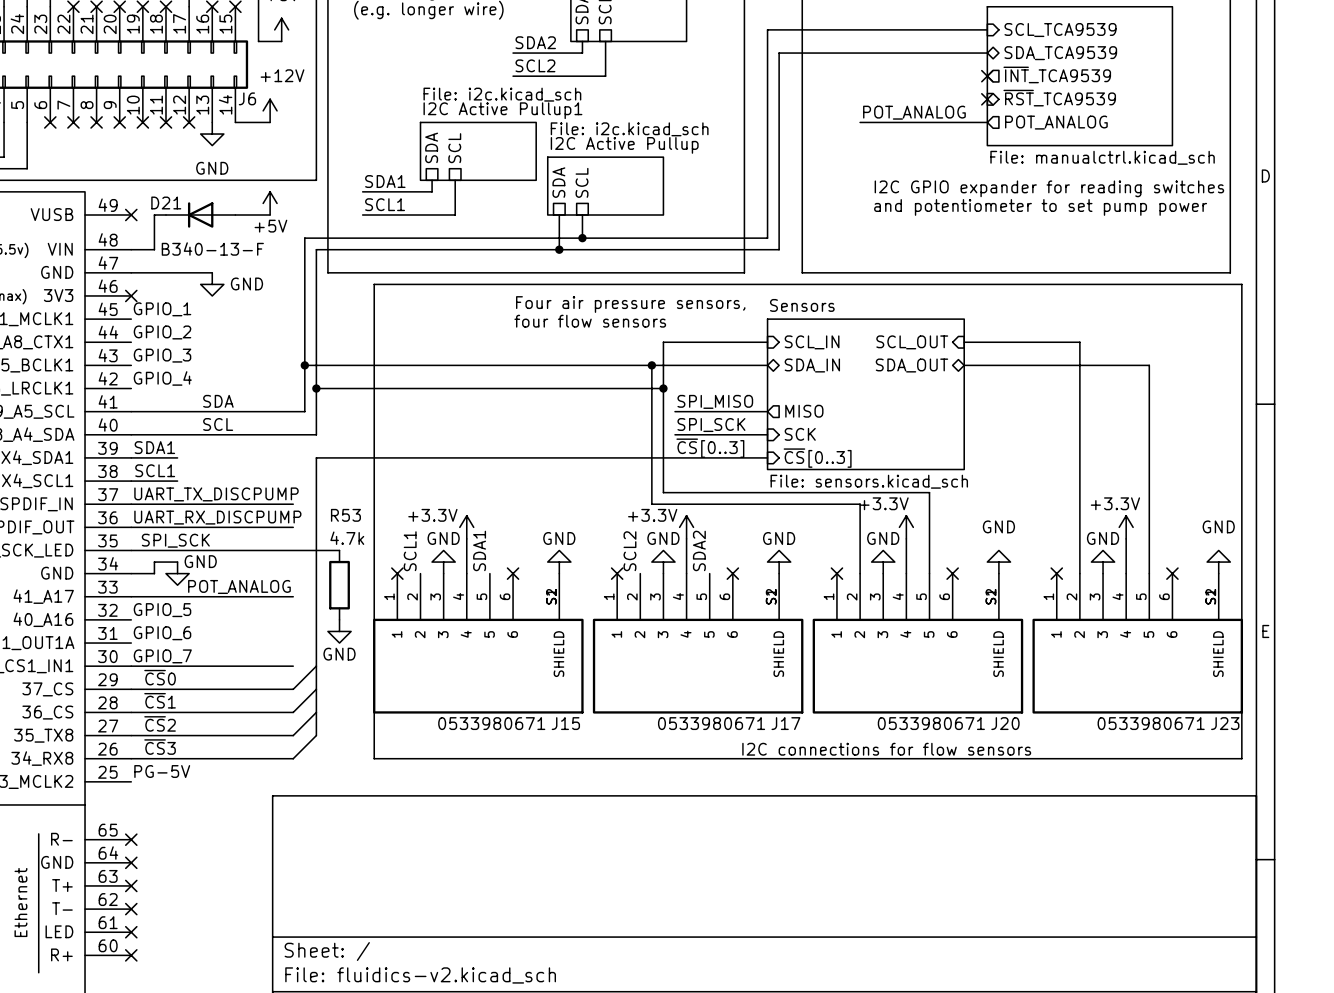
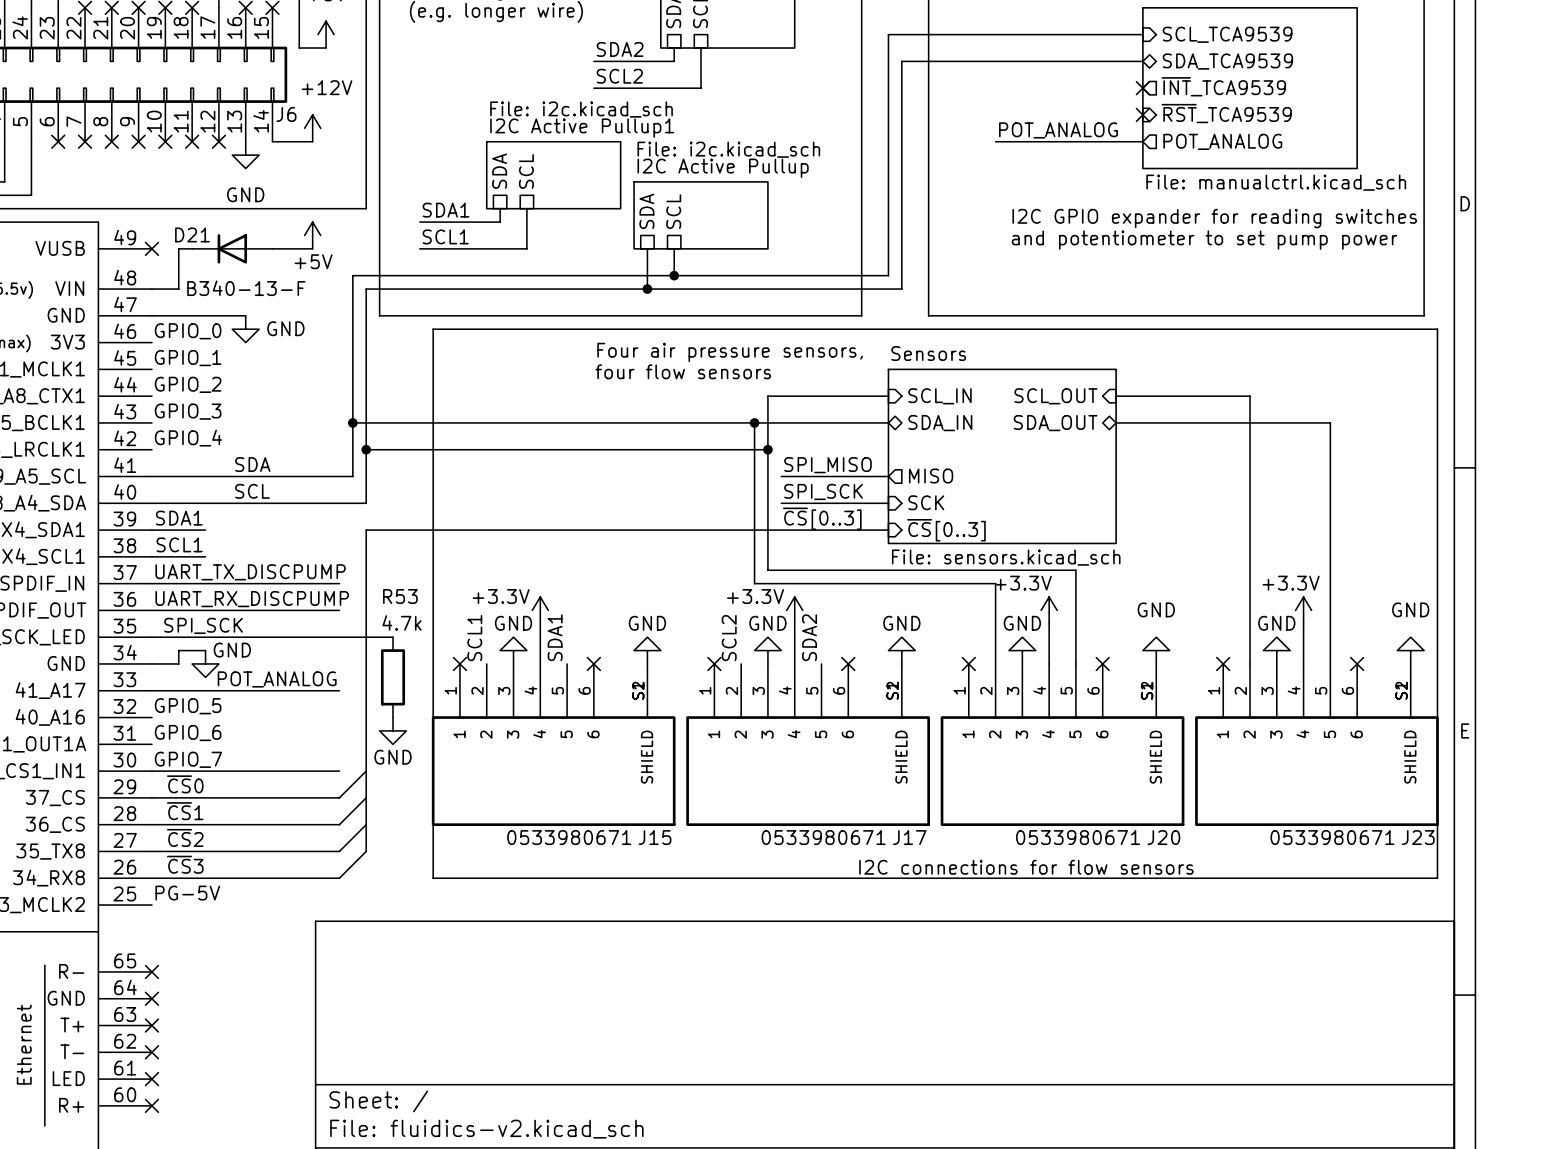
label: none -> GPIO_0 (188, 331)
no-connect mark: (131, 295) -> none

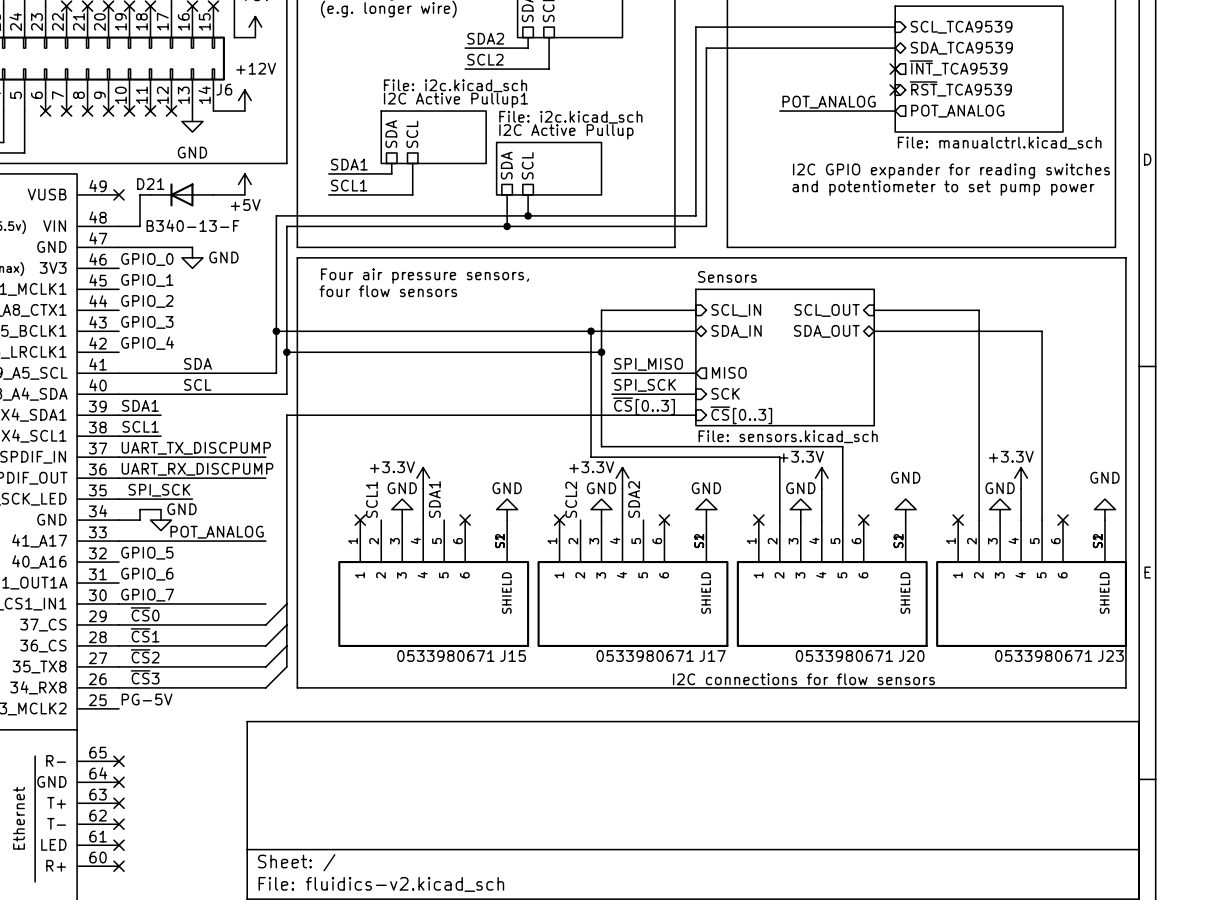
line: (433, 329) (433, 878) -> (339, 257) (297, 257) (297, 687) (339, 687)
text position: Four air pressure sensors, (730, 352) -> Four air pressure sensors, (425, 276)
text position: four flow sensors (683, 371) -> four flow sensors (388, 291)
wire: (245, 637) (393, 637) -> none
R53: 4.7k (393, 677) -> none
power symbol: GND (393, 730) -> none

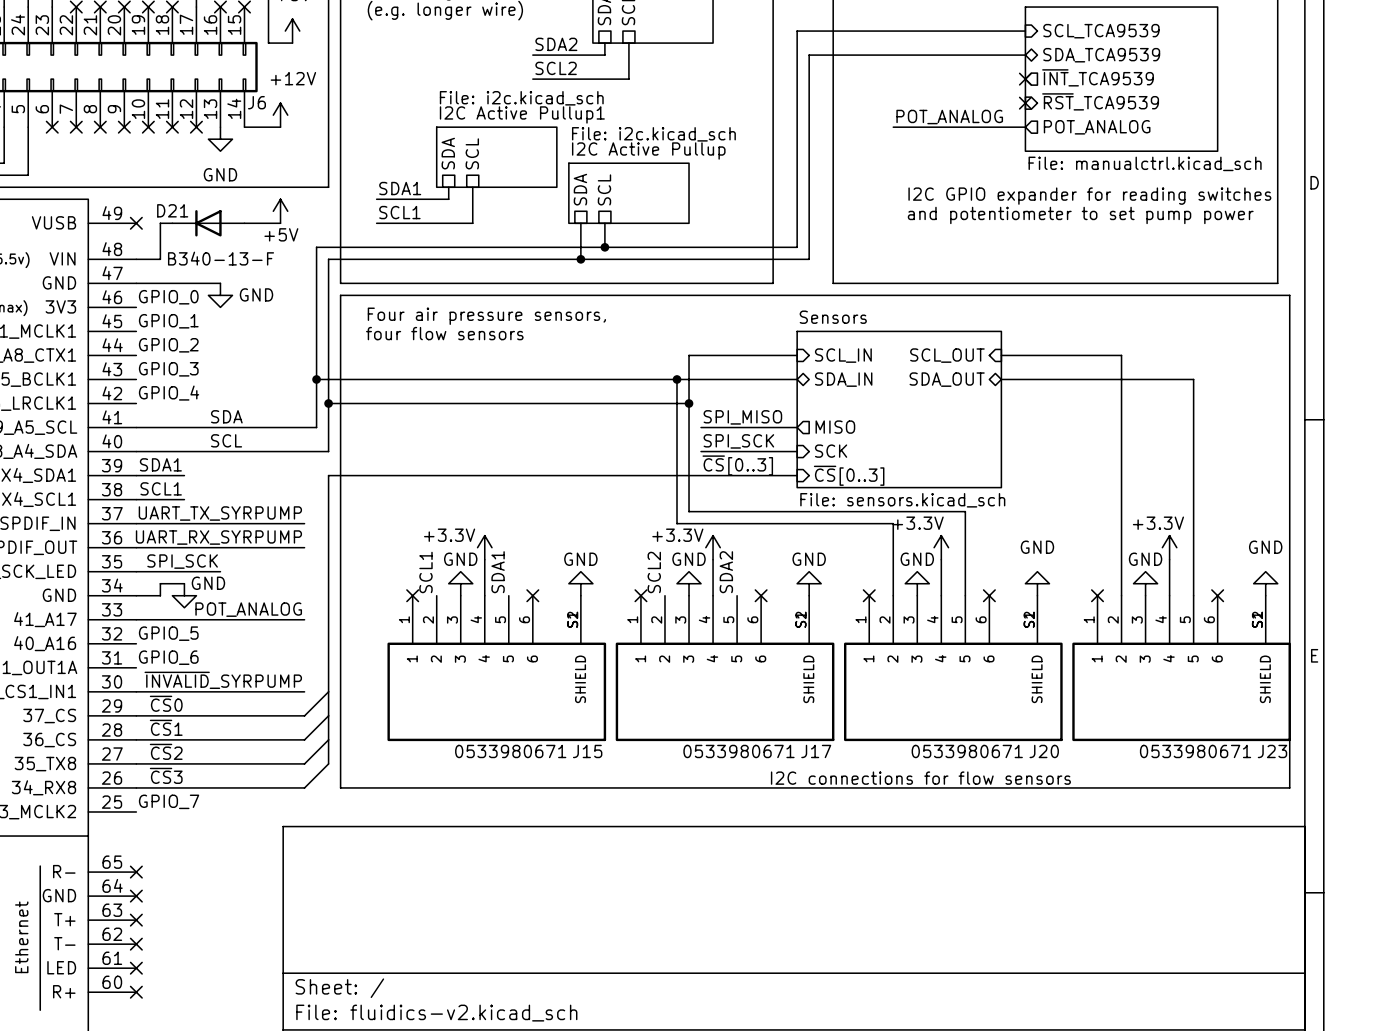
label: none -> UART_TX_SYRPUMP (220, 513)
label: UART_TX_DISCPUMP (196, 448) -> none
label: none -> UART_RX_SYRPUMP (218, 537)
label: UART_RX_DISCPUMP (197, 469) -> none
label: none -> ~{INVALID}_SYRPUMP (223, 680)
label: GPIO_7 (147, 595) -> none
label: PG-5V (147, 699) -> GPIO_7 (169, 801)

